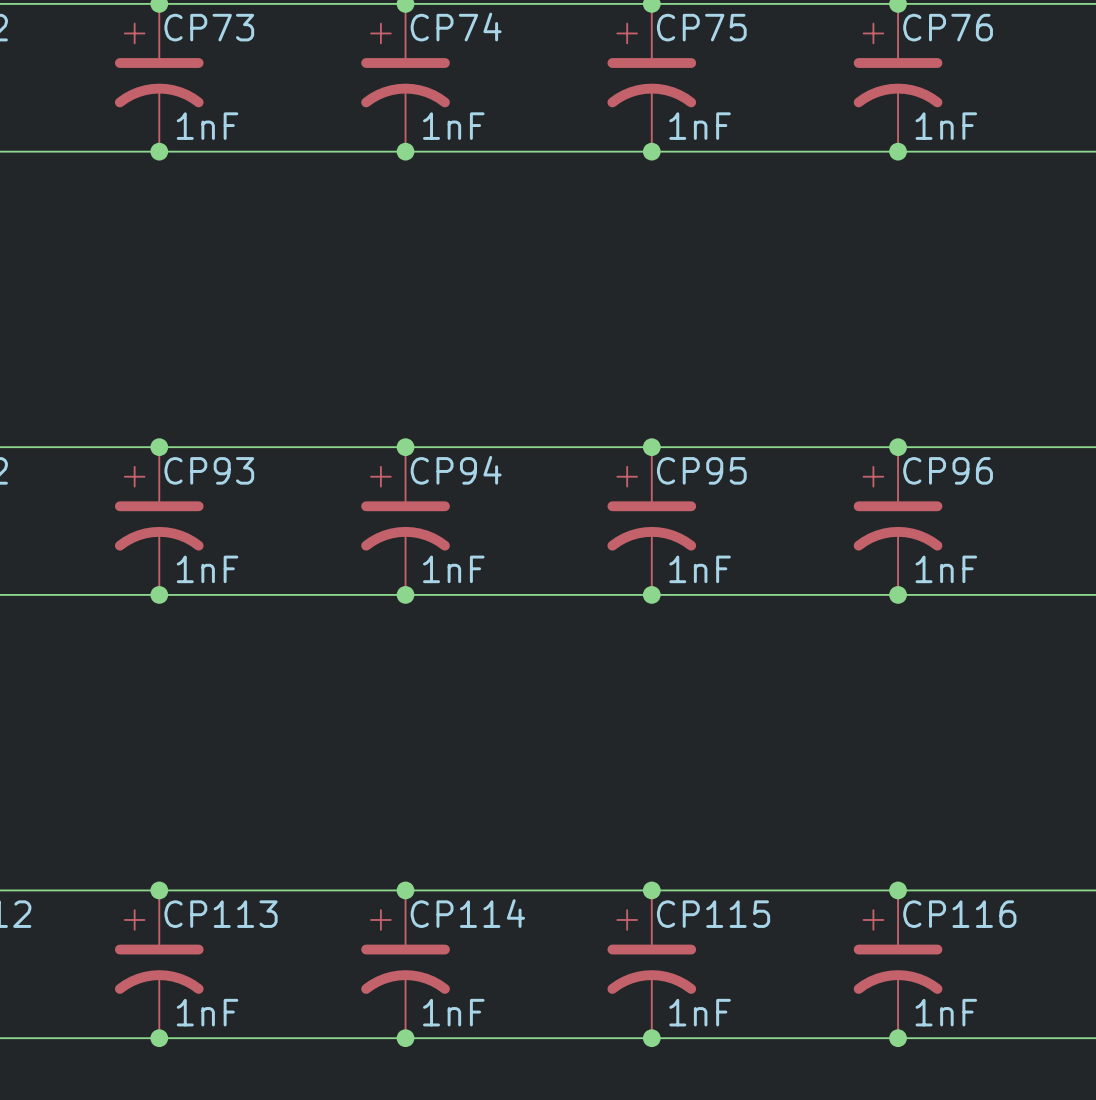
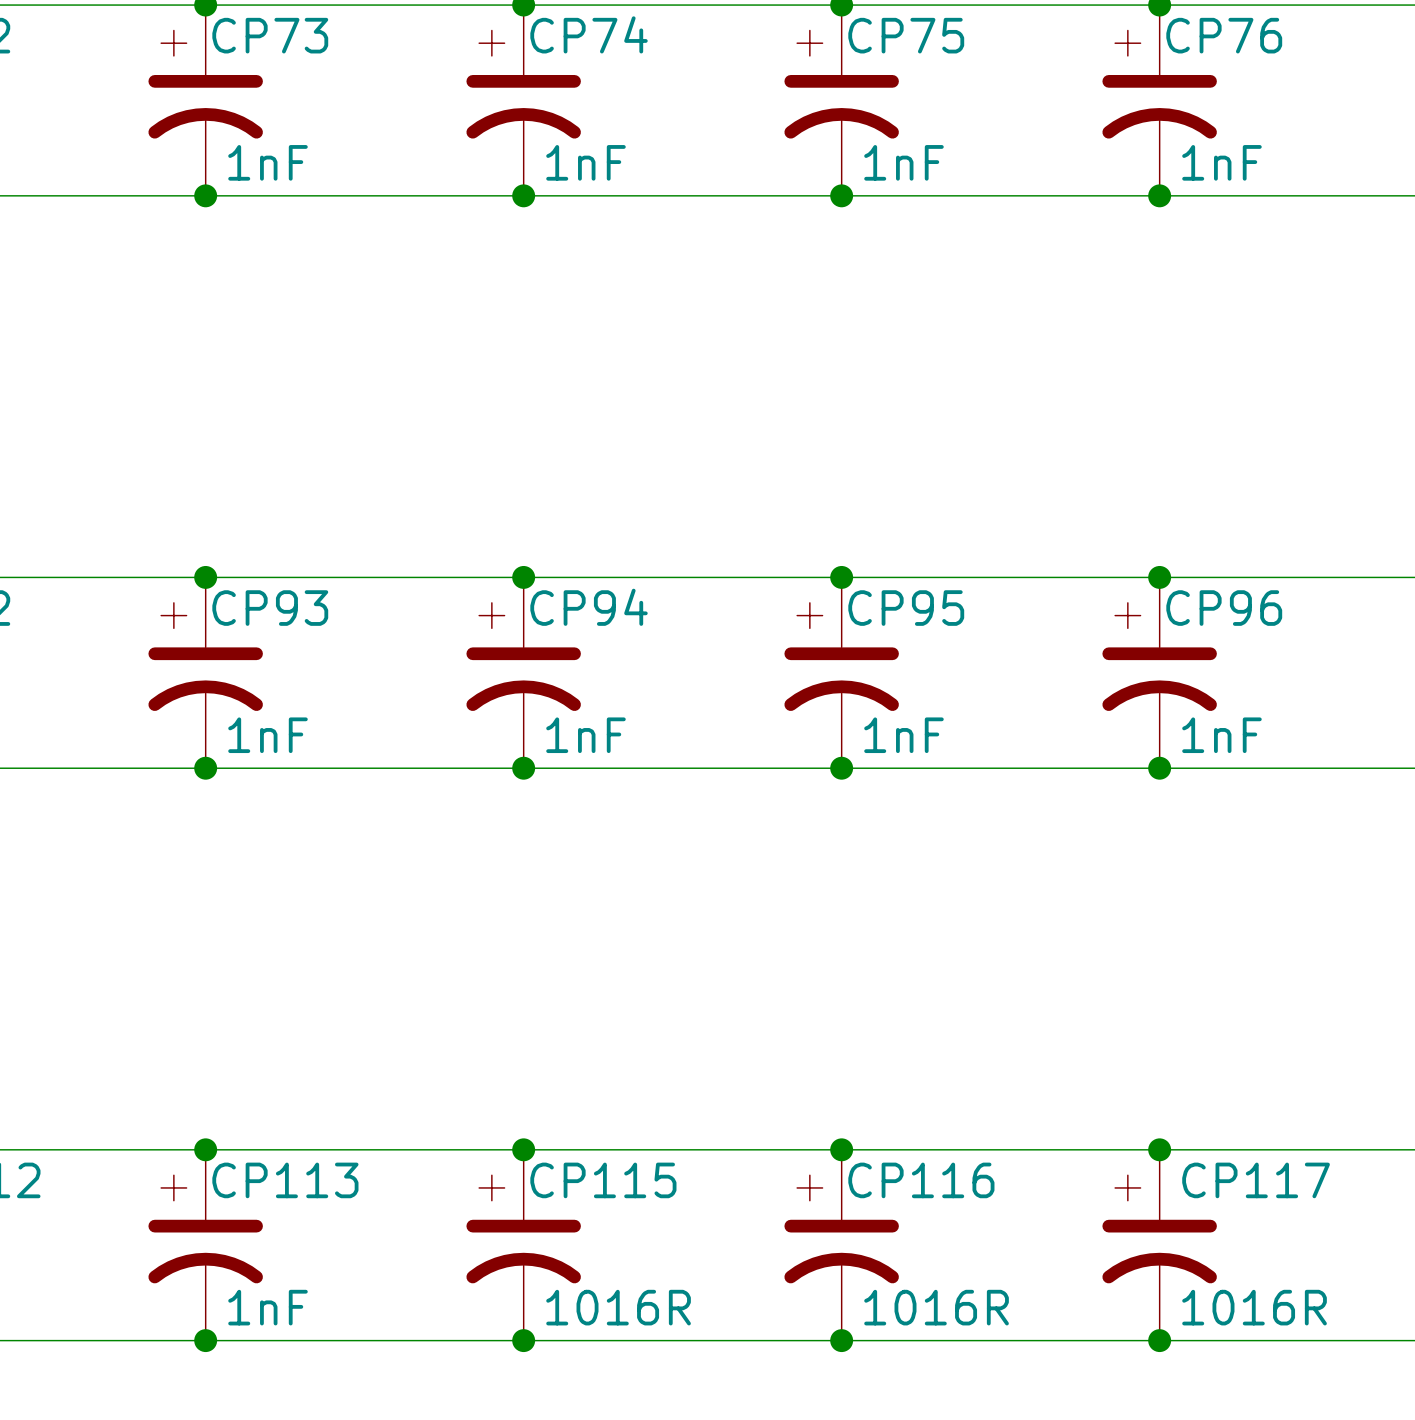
CP114 name: CP114 (467, 913) -> CP115 (603, 1180)
CP115 name: CP115 (713, 914) -> CP116 (921, 1180)
CP116 name: CP116 (959, 914) -> CP117 (1256, 1180)
CP114 value: 1nF (453, 1012) -> 1016R (618, 1307)
CP115 value: 1nF (700, 1012) -> 1016R (936, 1307)
CP116 value: 1nF (946, 1012) -> 1016R (1254, 1307)

